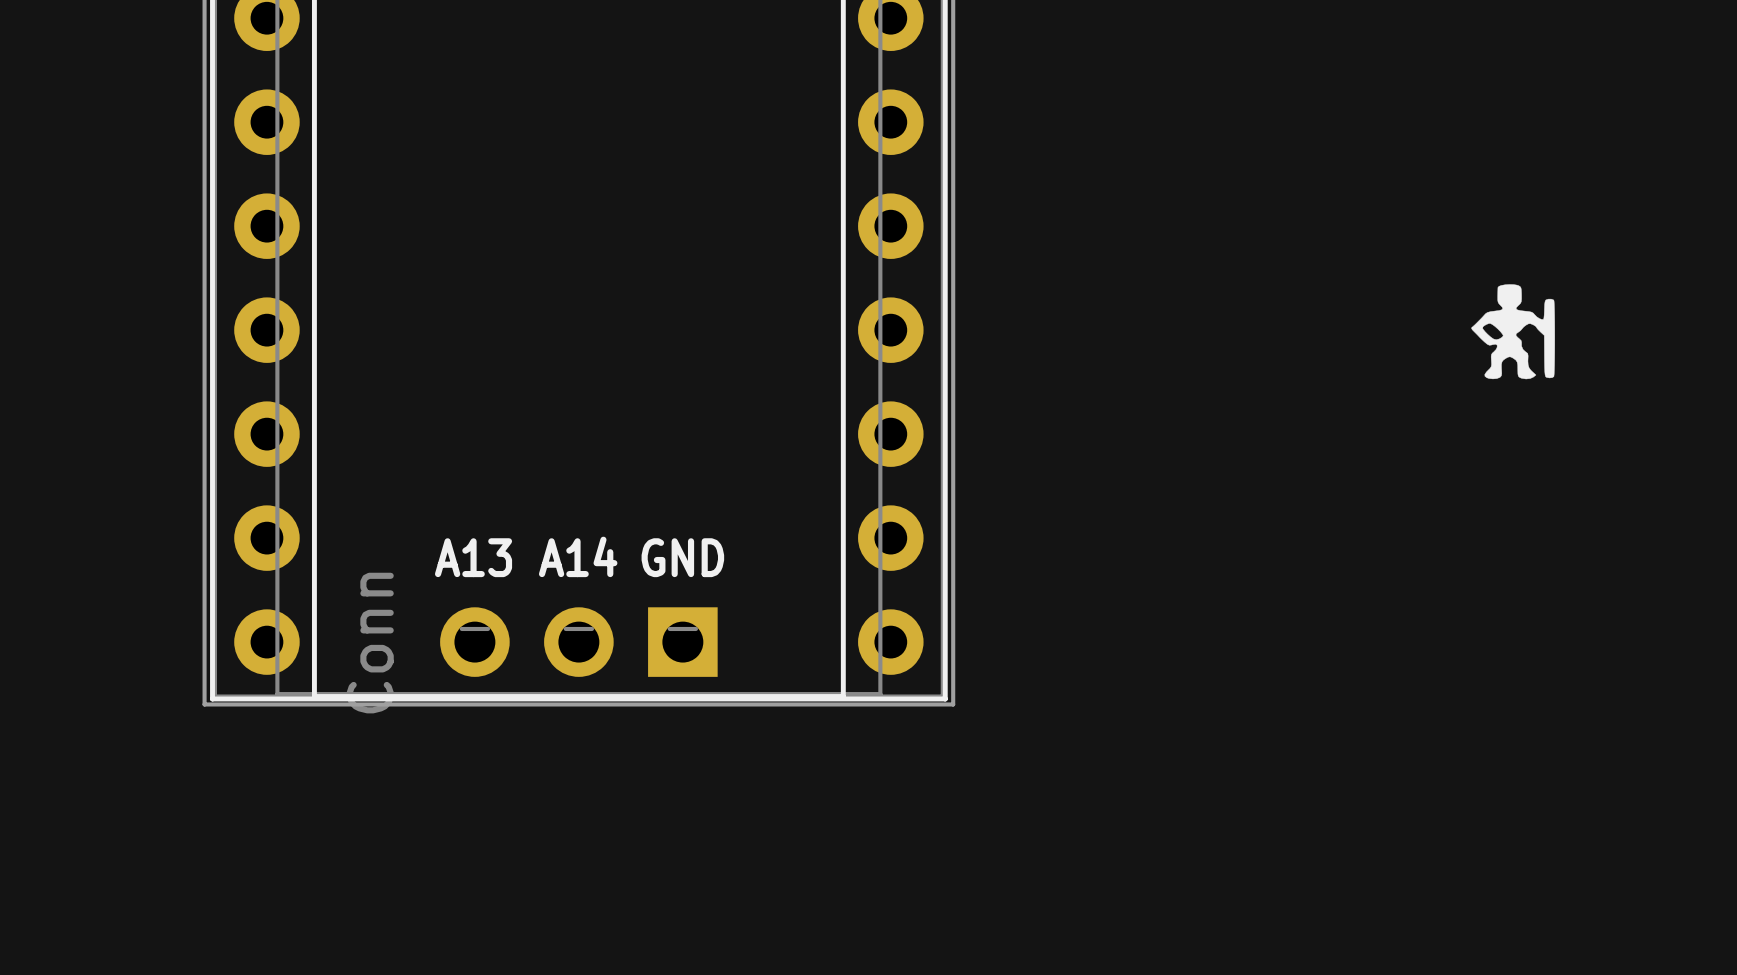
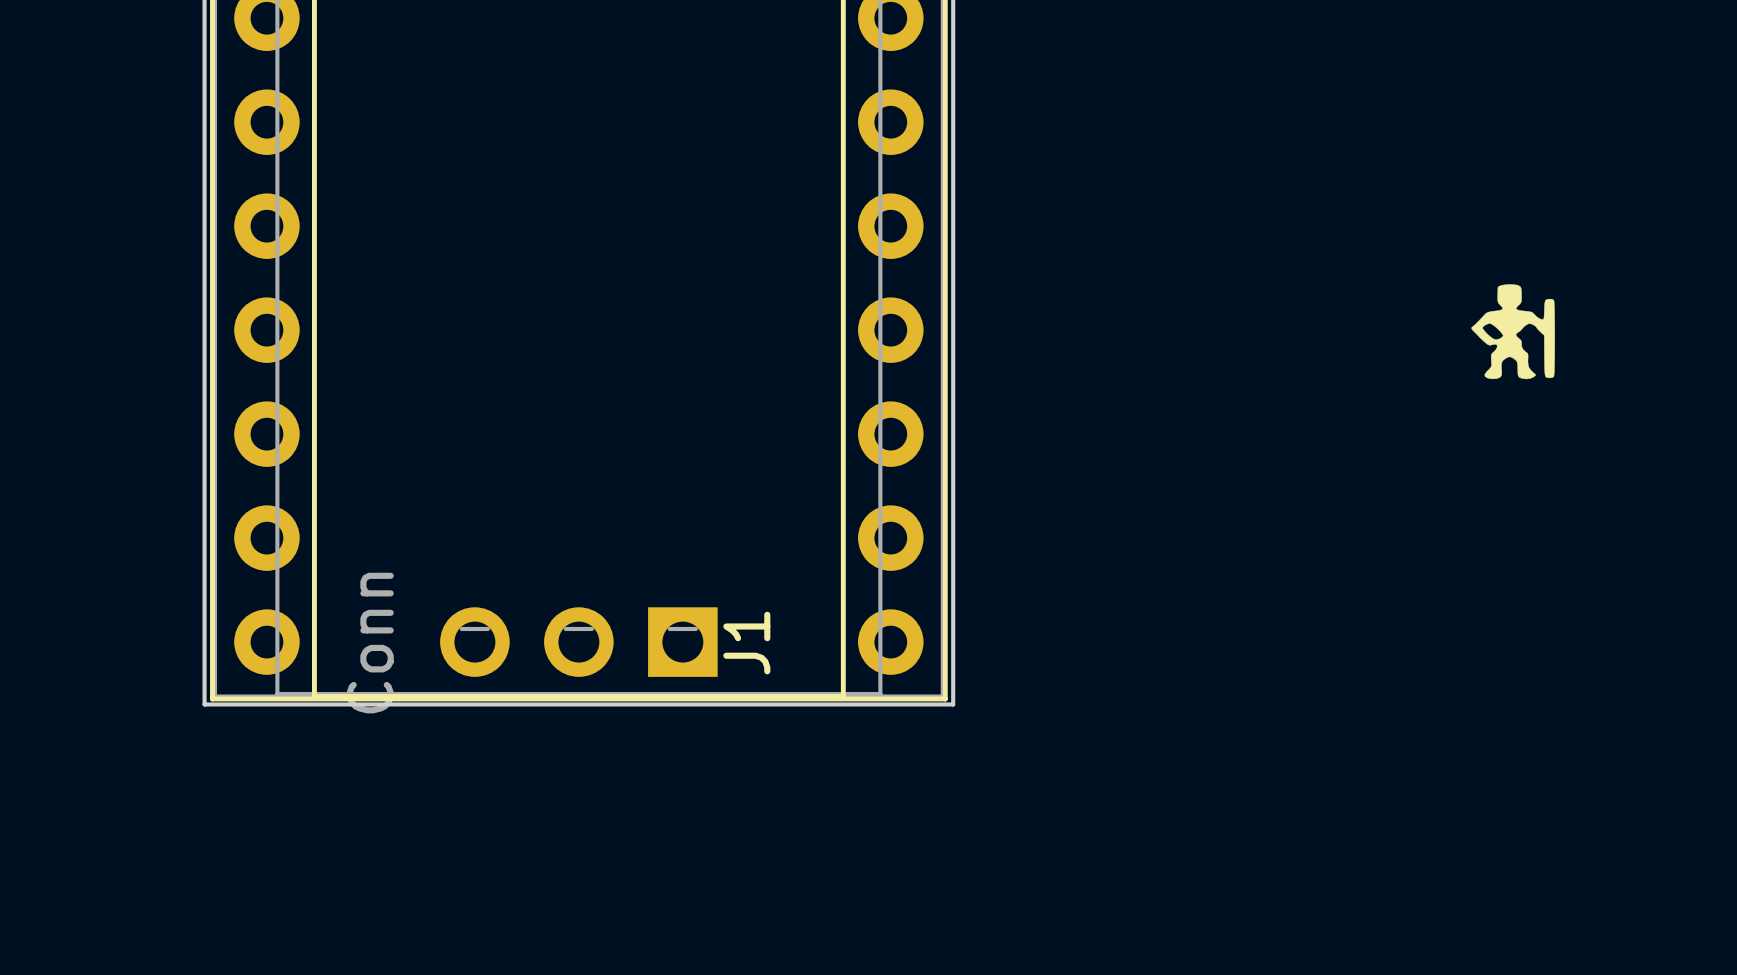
text: A14 (578, 556) -> none
text: A13 (473, 557) -> none
text: GND (682, 557) -> none
J1 name: none -> J1 (746, 643)

